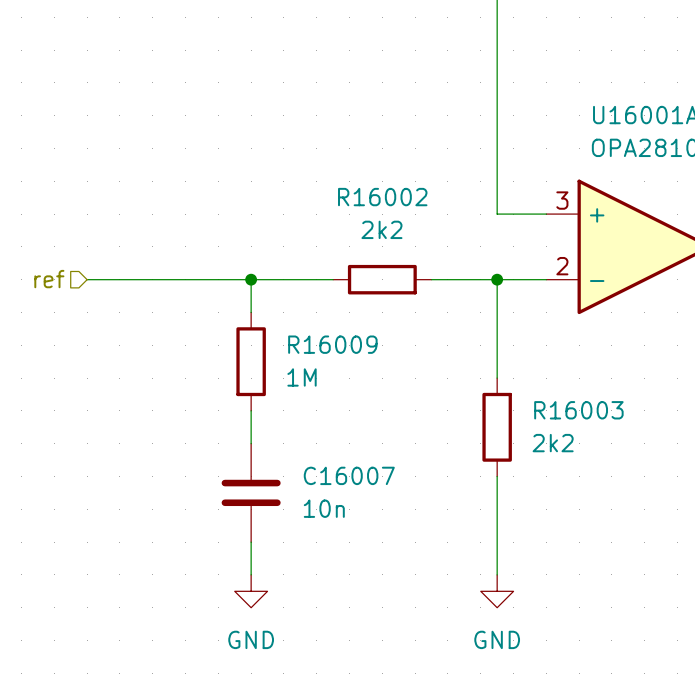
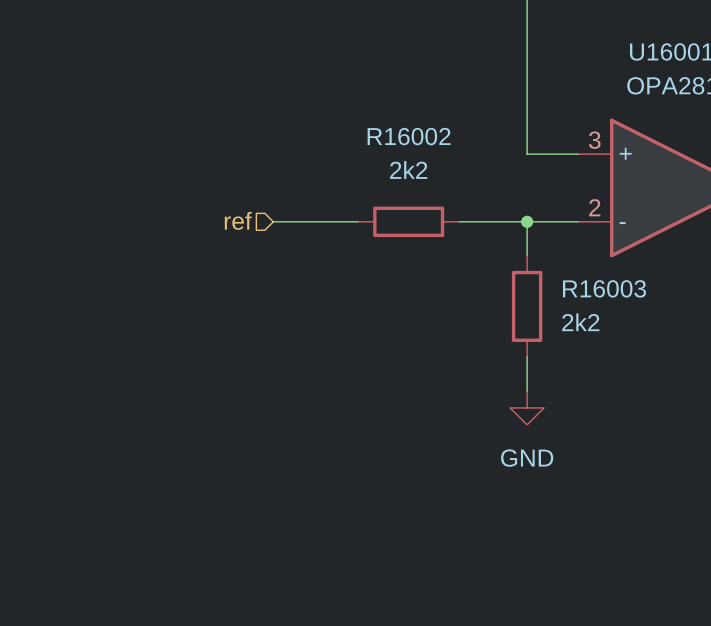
hierarchical label position: ref (49, 279) -> ref (238, 220)
wire: (87, 279) (251, 279) (251, 312) -> none
junction: (251, 279) -> none
wire: (497, 312) (497, 378) -> none
R16009: 1M (251, 361) -> none
wire: (251, 410) (251, 443) -> (527, 357) (527, 391)
R16003 position: (497, 427) -> (527, 306)
wire: (497, 476) (497, 574) -> none
C16007: 10n (251, 492) -> none
wire: (251, 542) (251, 574) -> none
power symbol: GND (251, 591) -> none
power symbol position: GND (497, 591) -> GND (527, 407)

